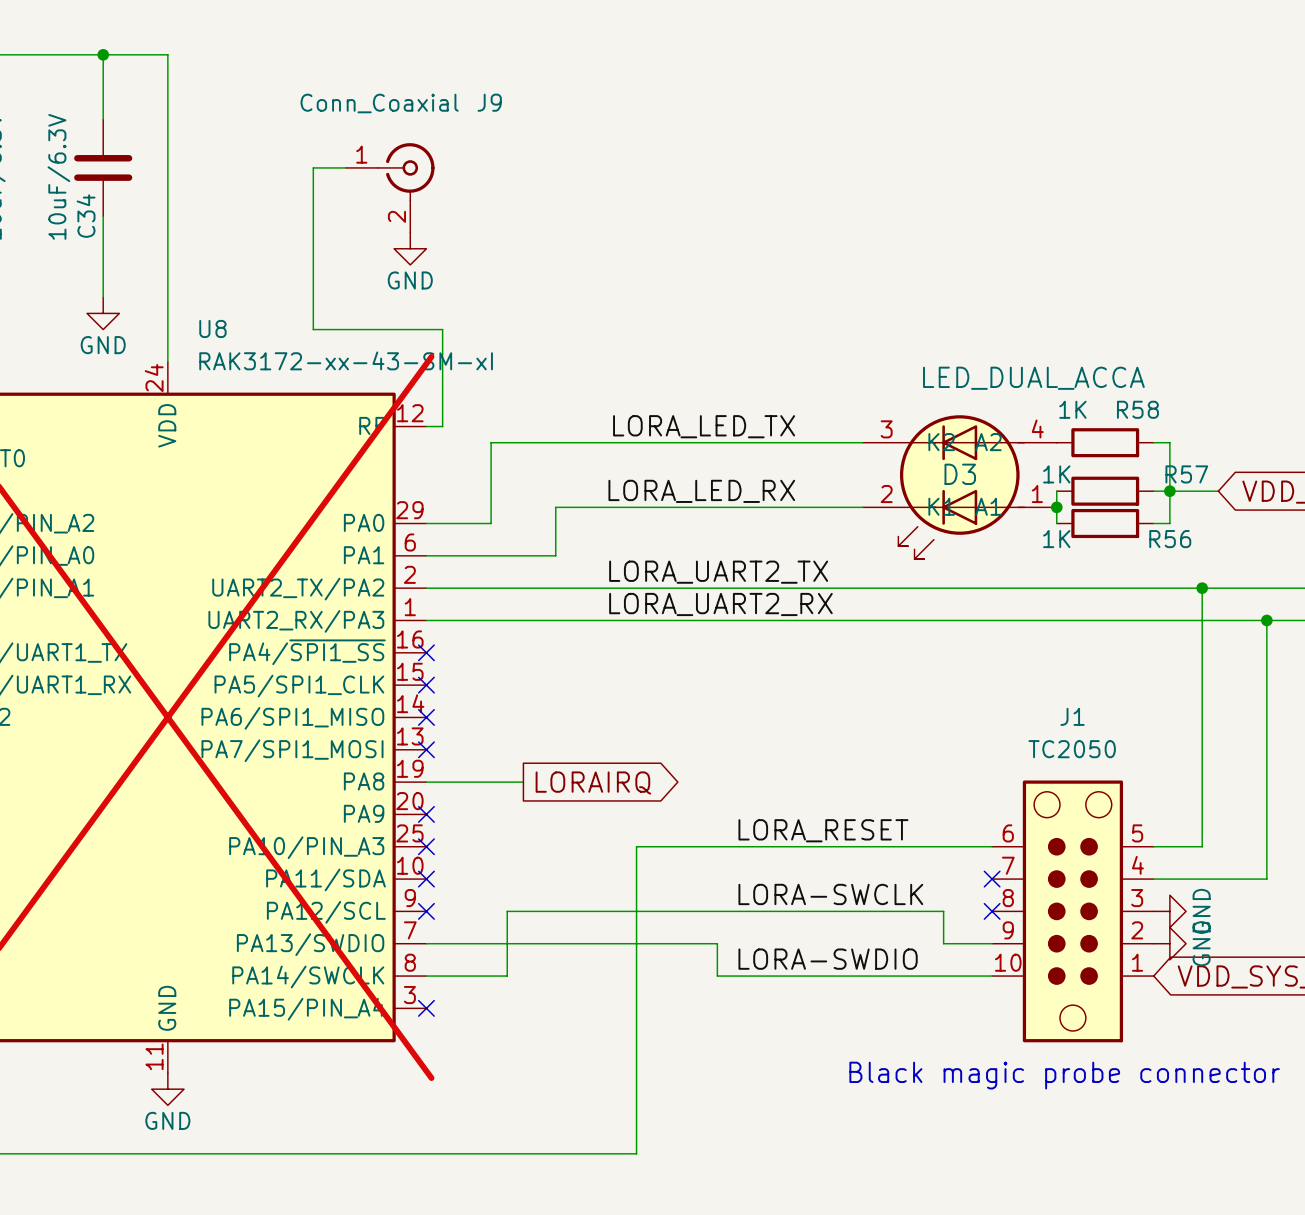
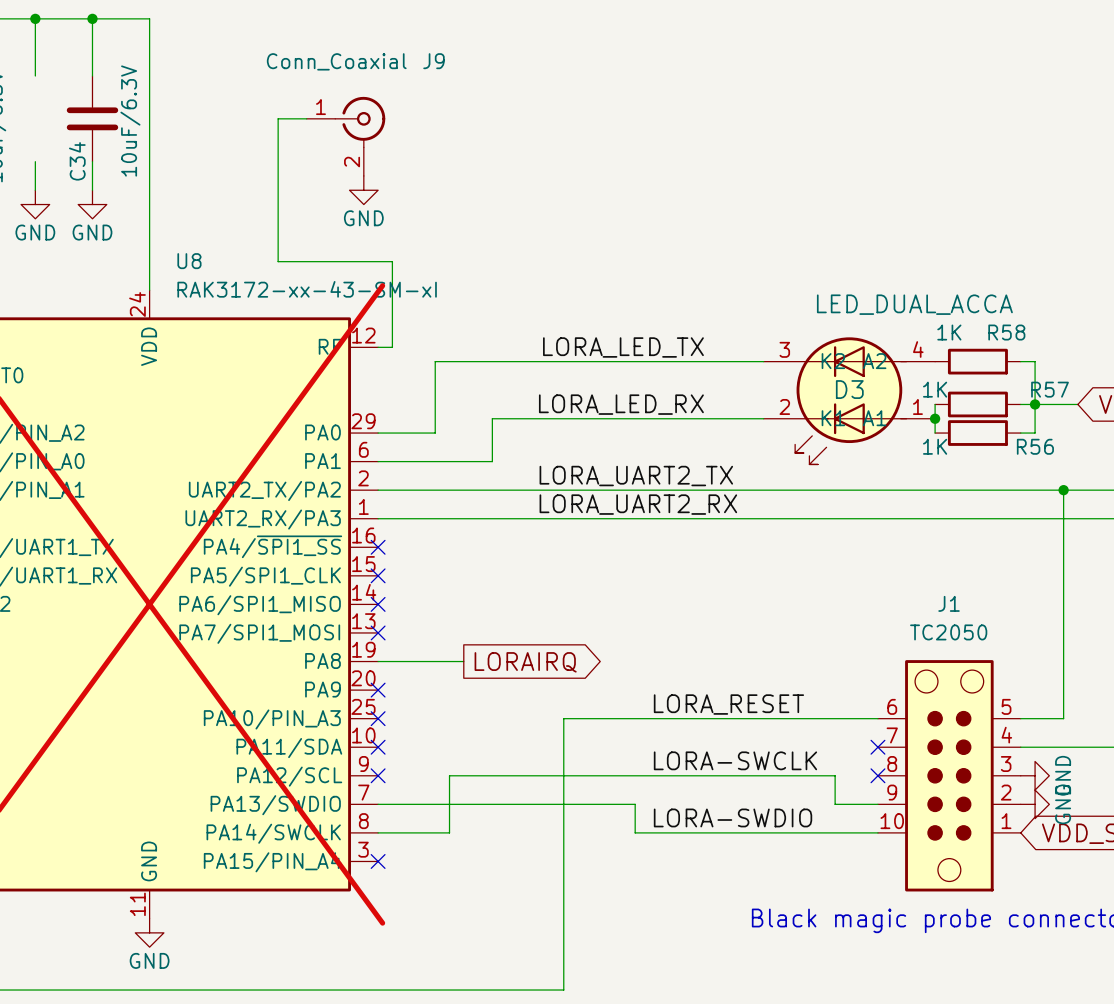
wire: none -> (35, 18) (35, 75)
junction: none -> (35, 18)
C34 value position: 10uF/6.3V (58, 176) -> 10uF/6.3V (130, 121)
wire: none -> (35, 161) (35, 190)
wire: (103, 248) (103, 297) -> none
power symbol: none -> GND (35, 204)
power symbol: none -> GND (92, 204)
power symbol: GND (103, 313) -> none

